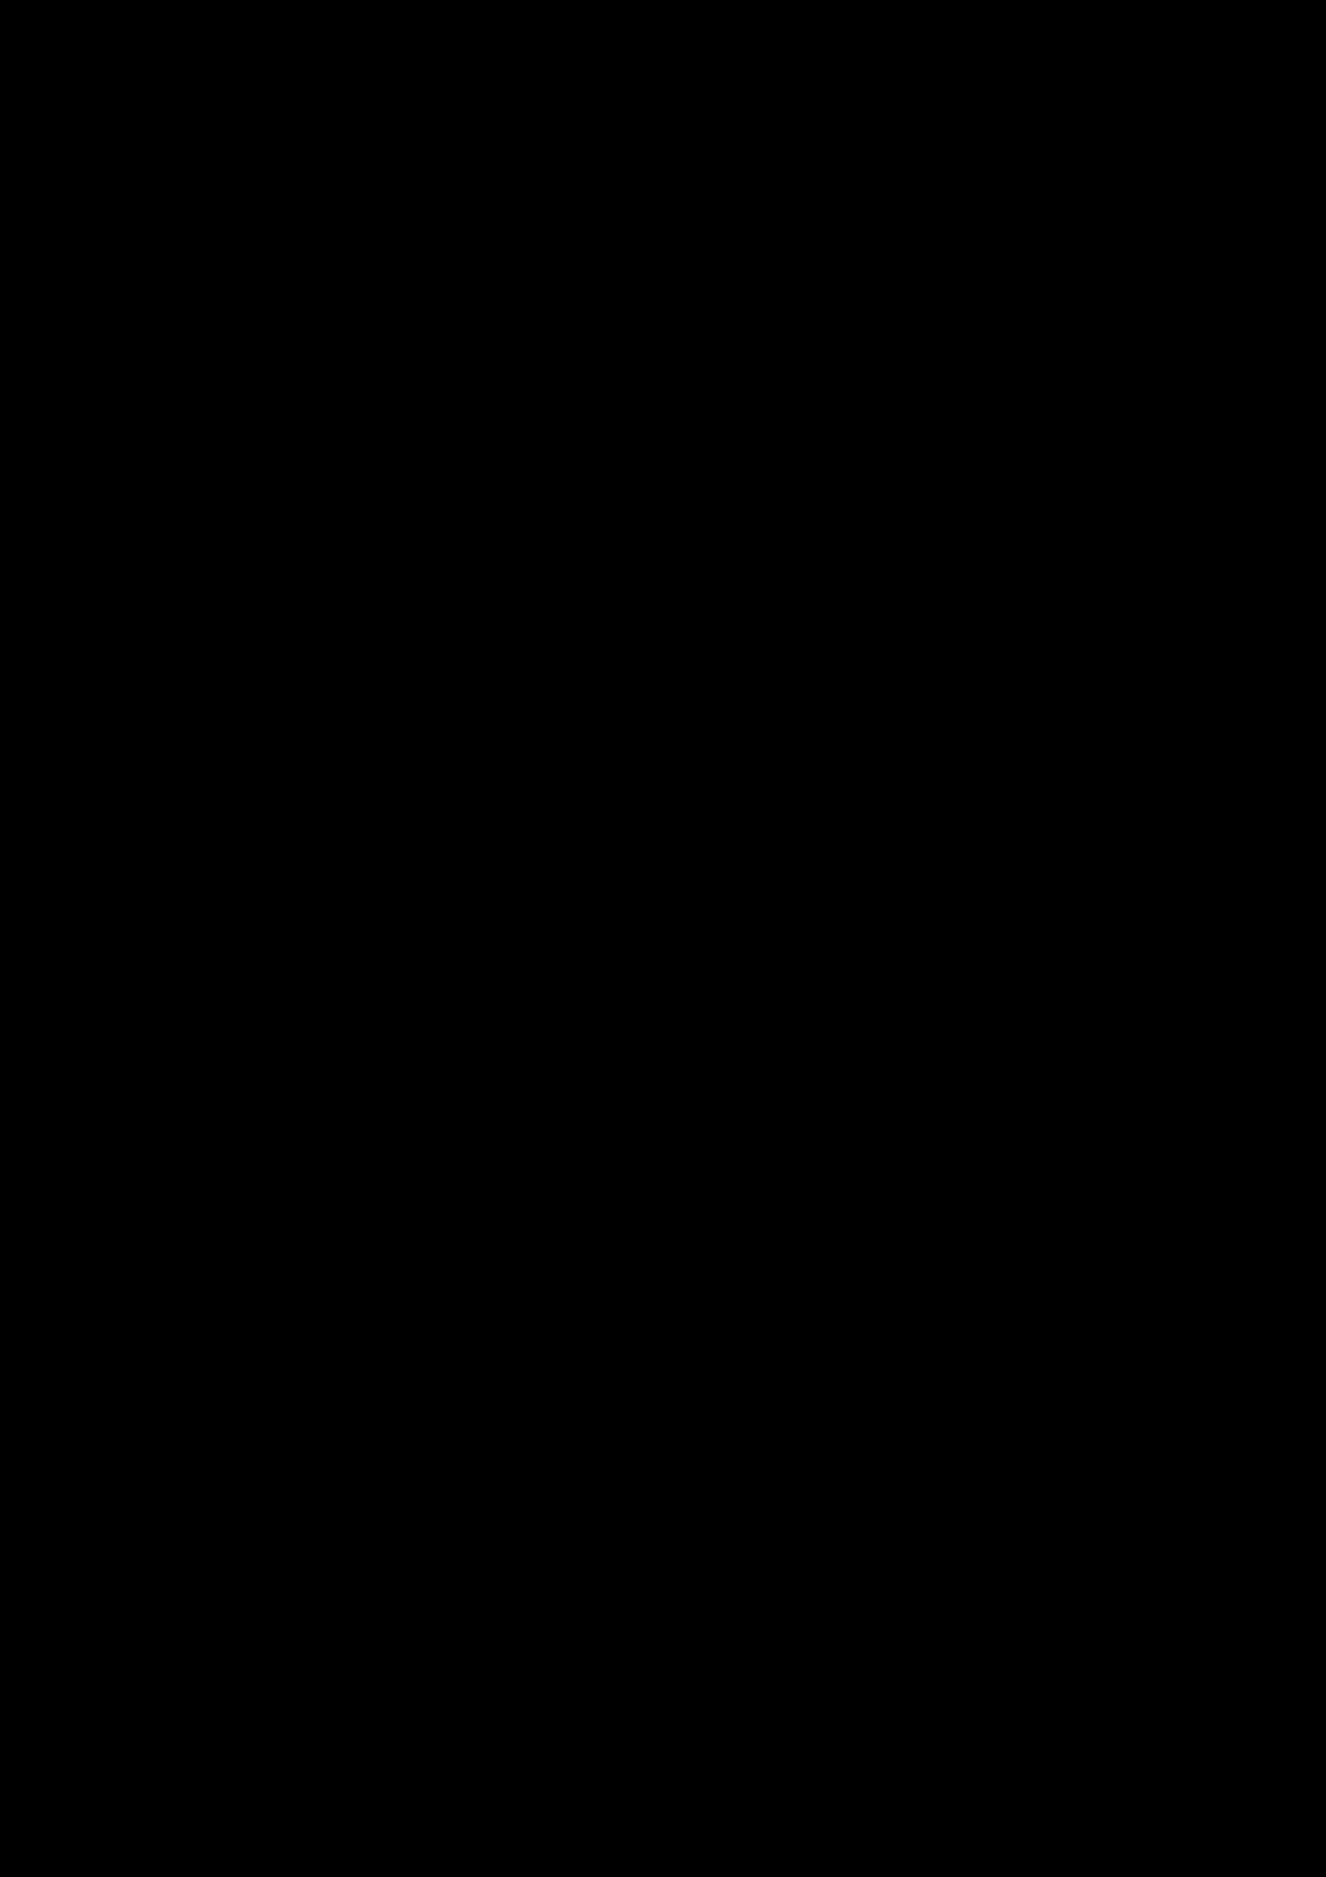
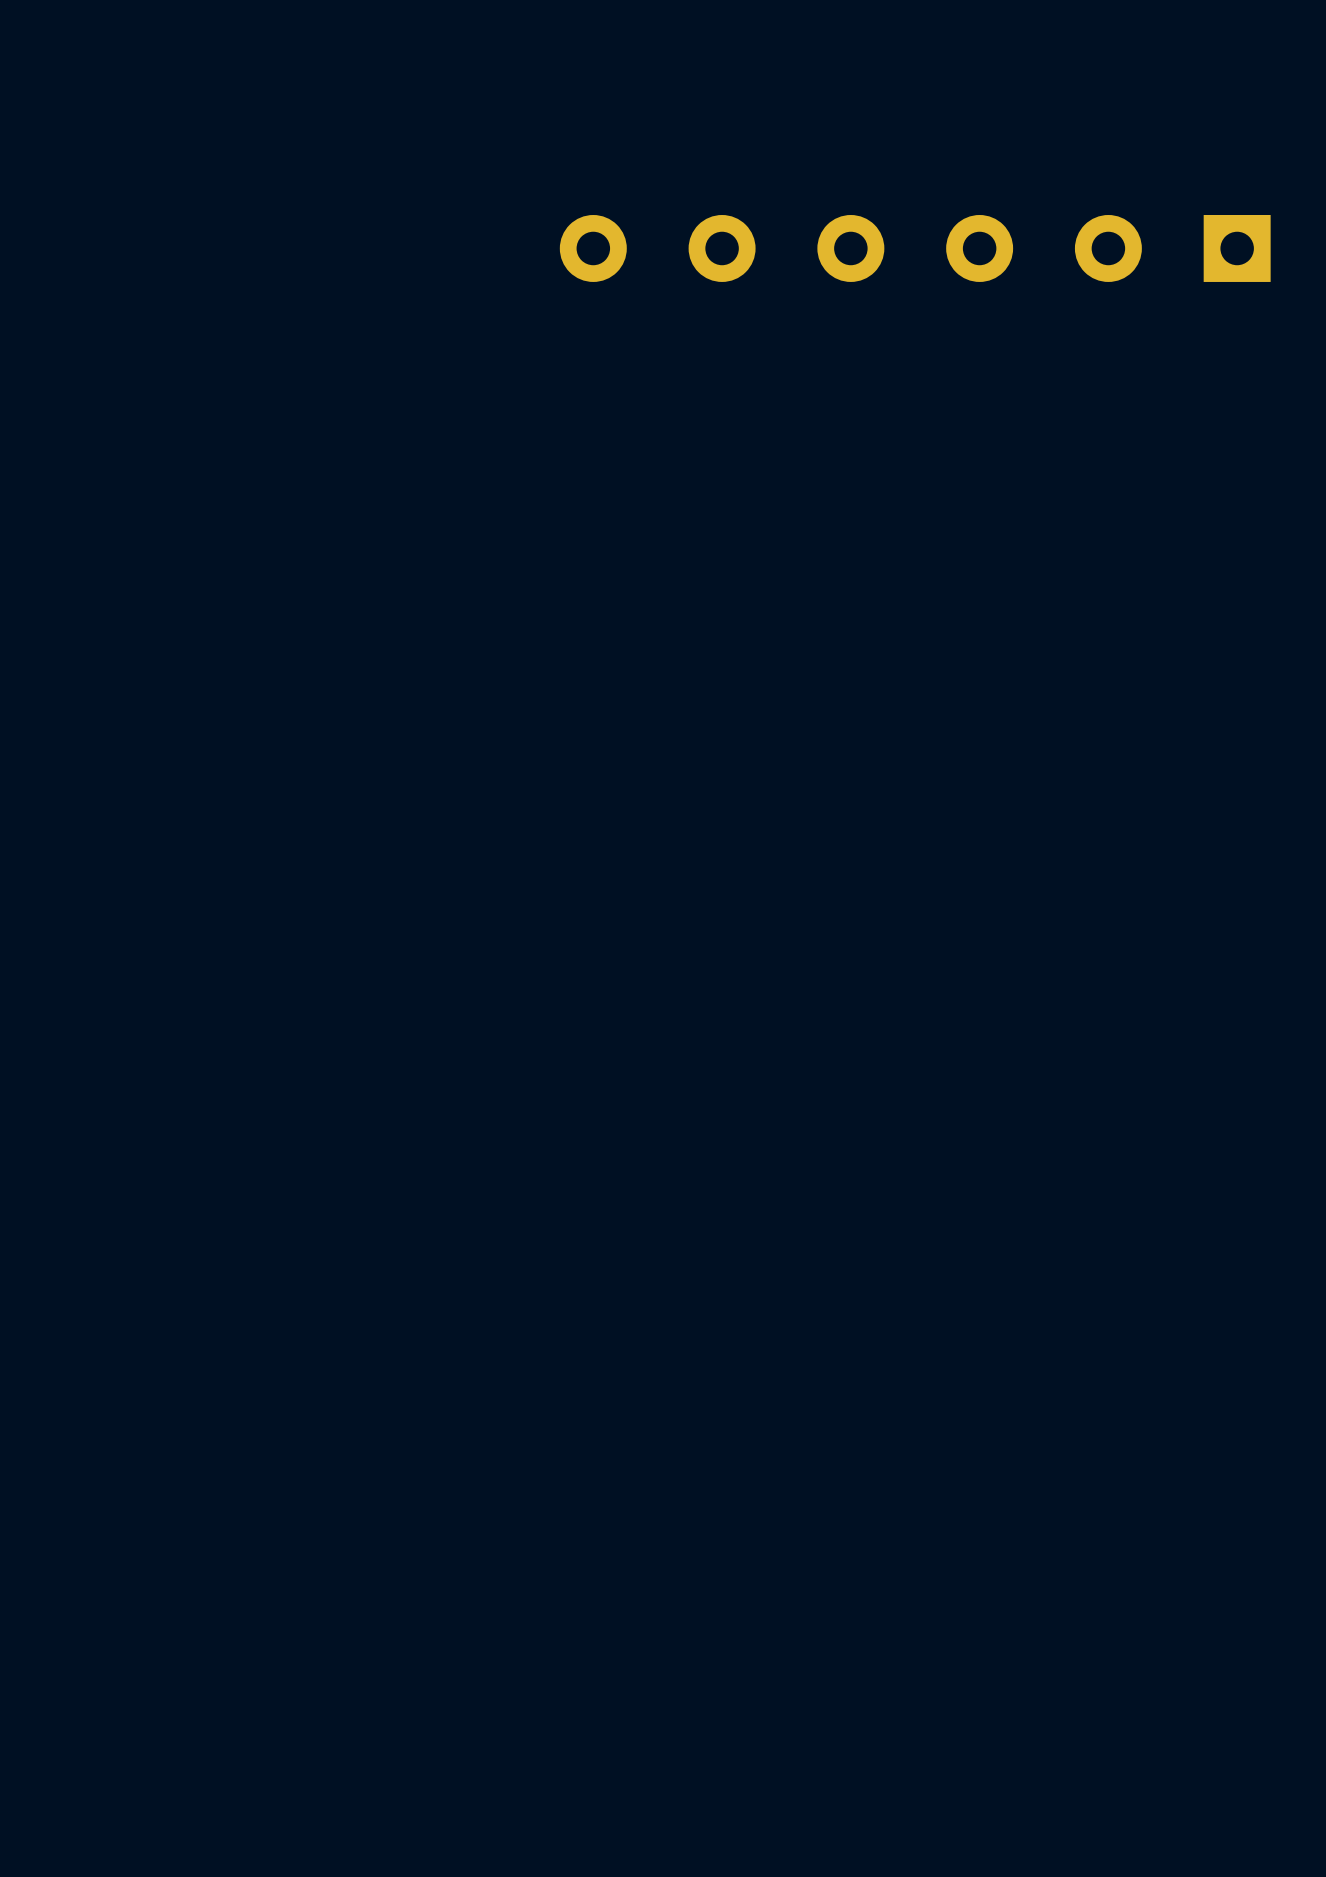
part: none -> (915, 248)

